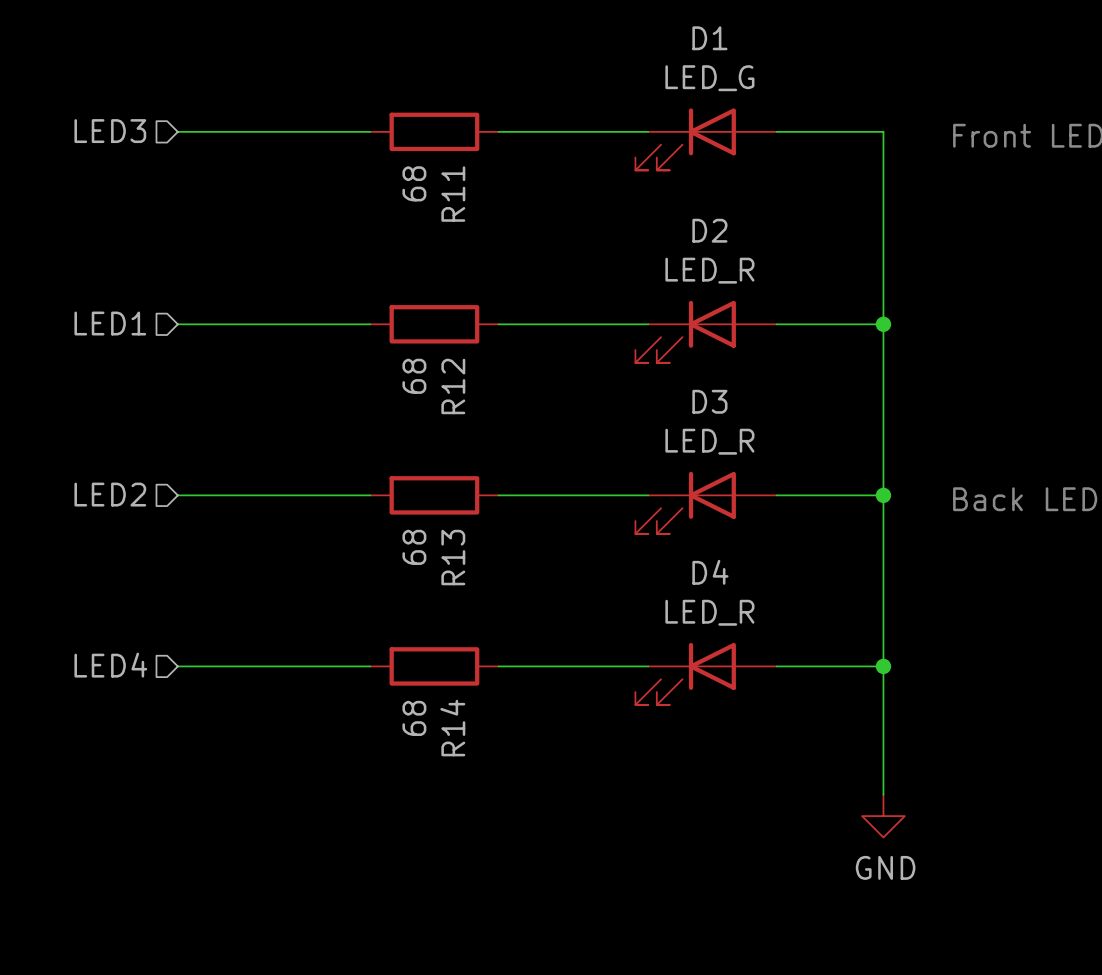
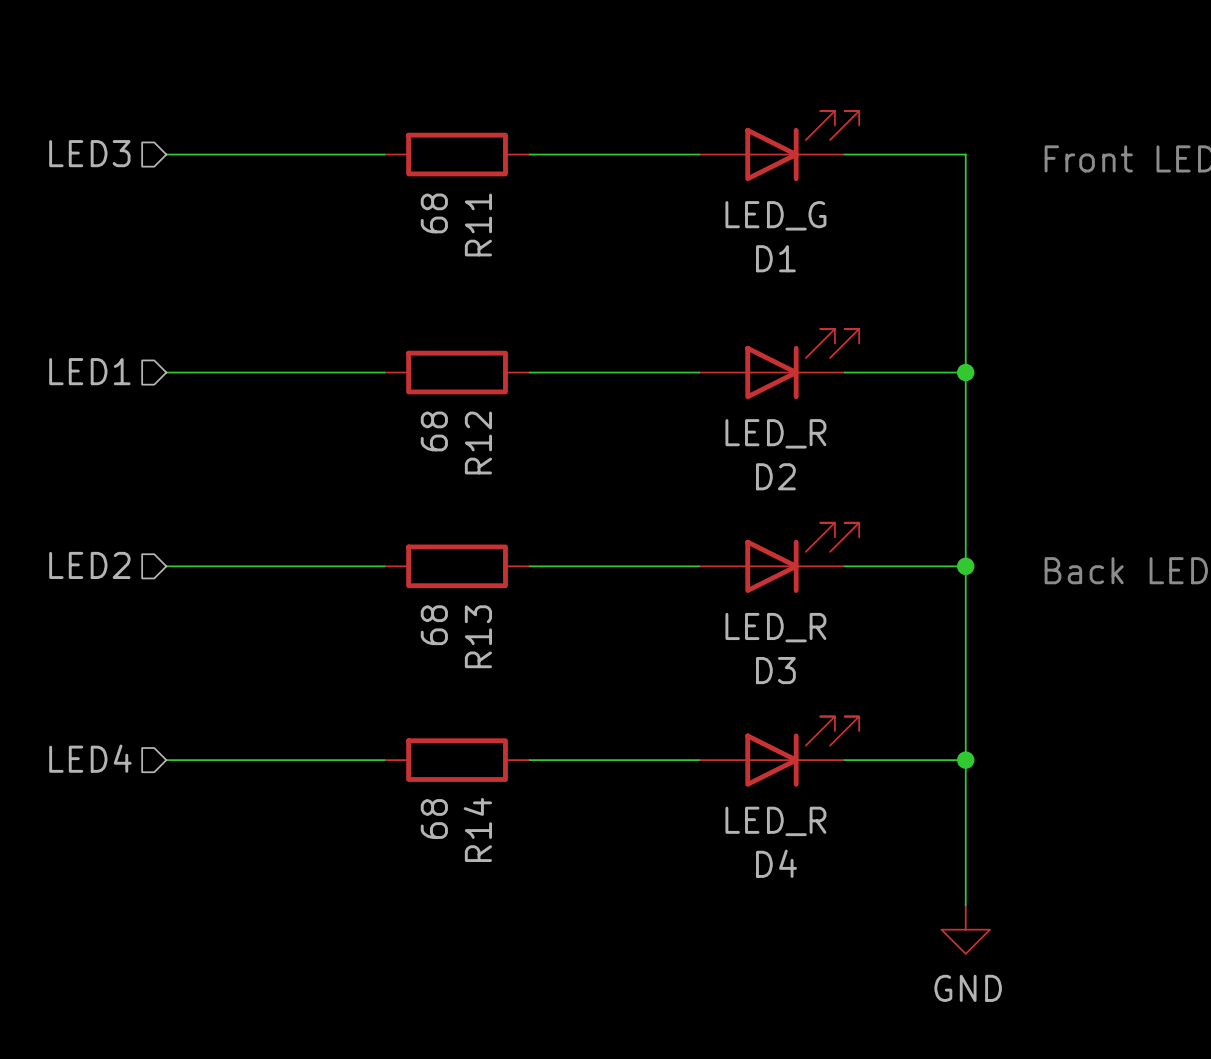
D1 rotation: 0° (685, 139) -> 180° (802, 146)
D2 rotation: 0° (685, 331) -> 180° (802, 364)
D3 rotation: 0° (685, 502) -> 180° (802, 557)
D4 rotation: 0° (685, 673) -> 180° (802, 751)

